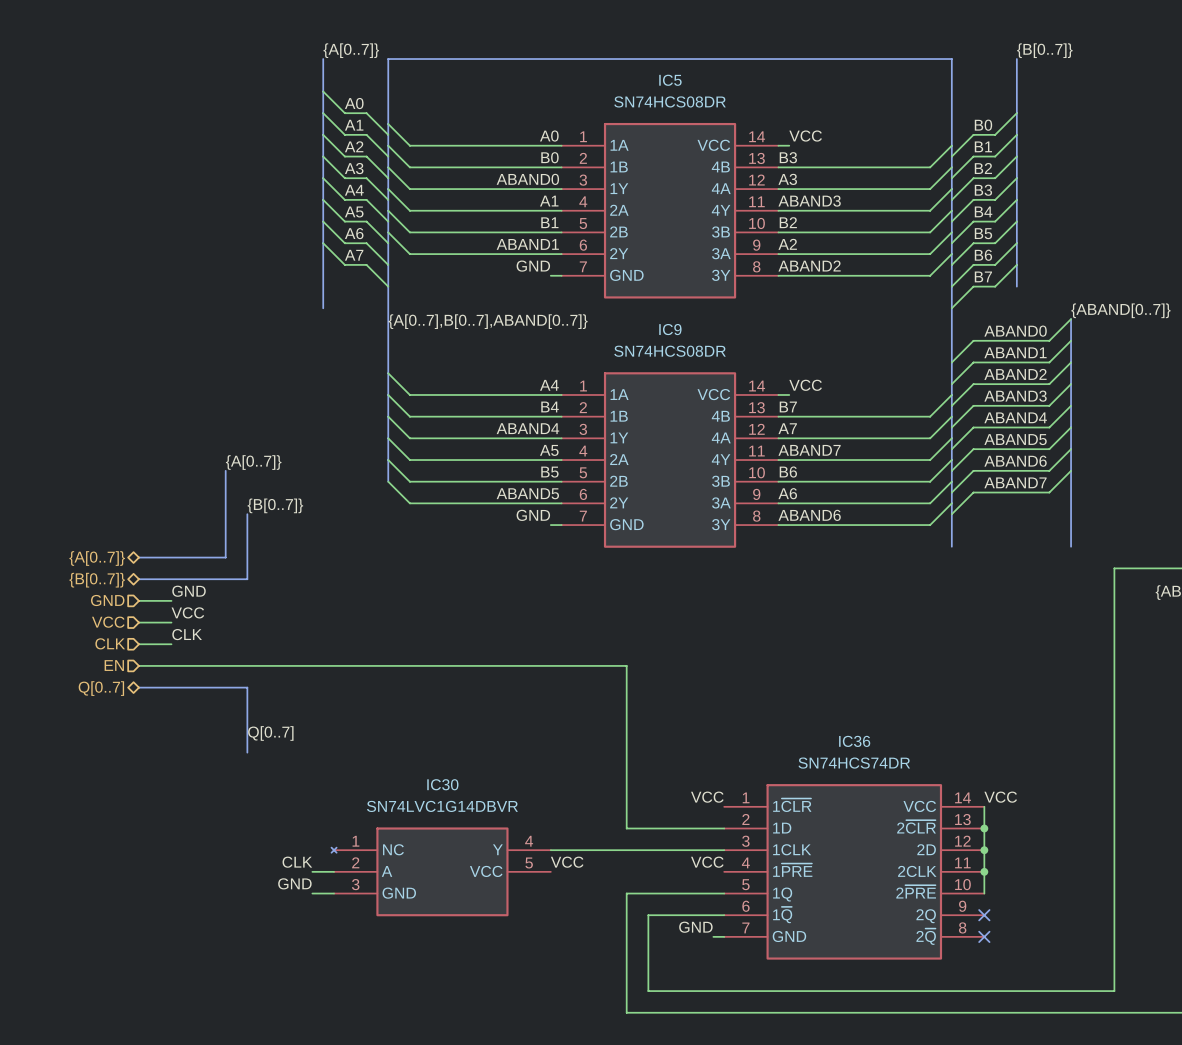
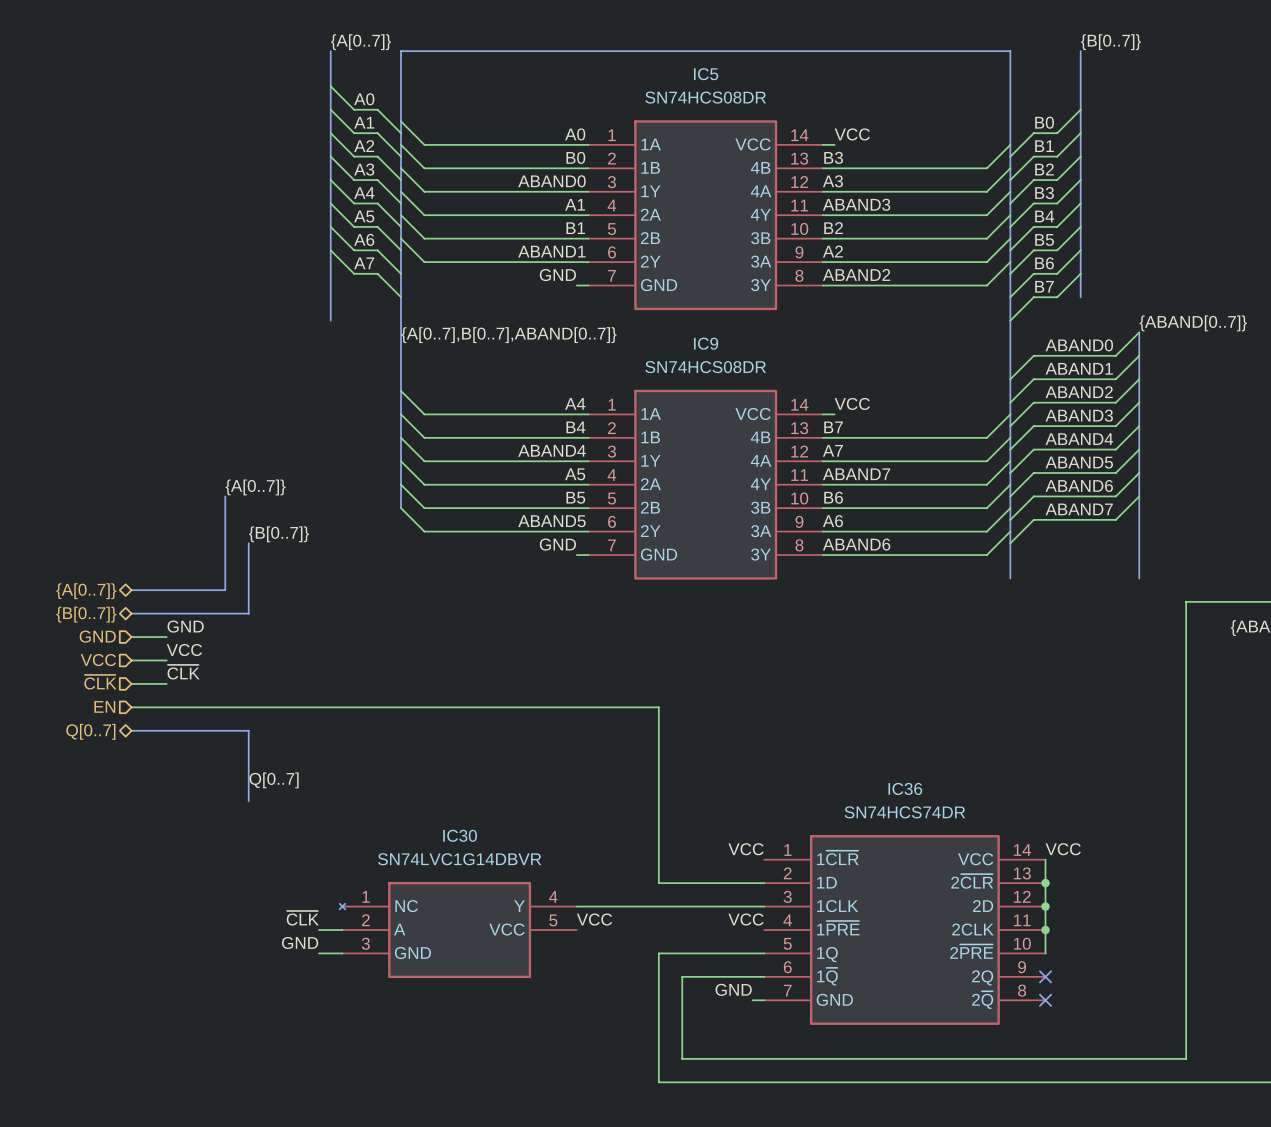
label: CLK (187, 634) -> ~{CLK} (183, 672)
hierarchical label: CLK (110, 643) -> ~{CLK} (100, 682)
label: CLK (297, 862) -> ~{CLK} (302, 918)

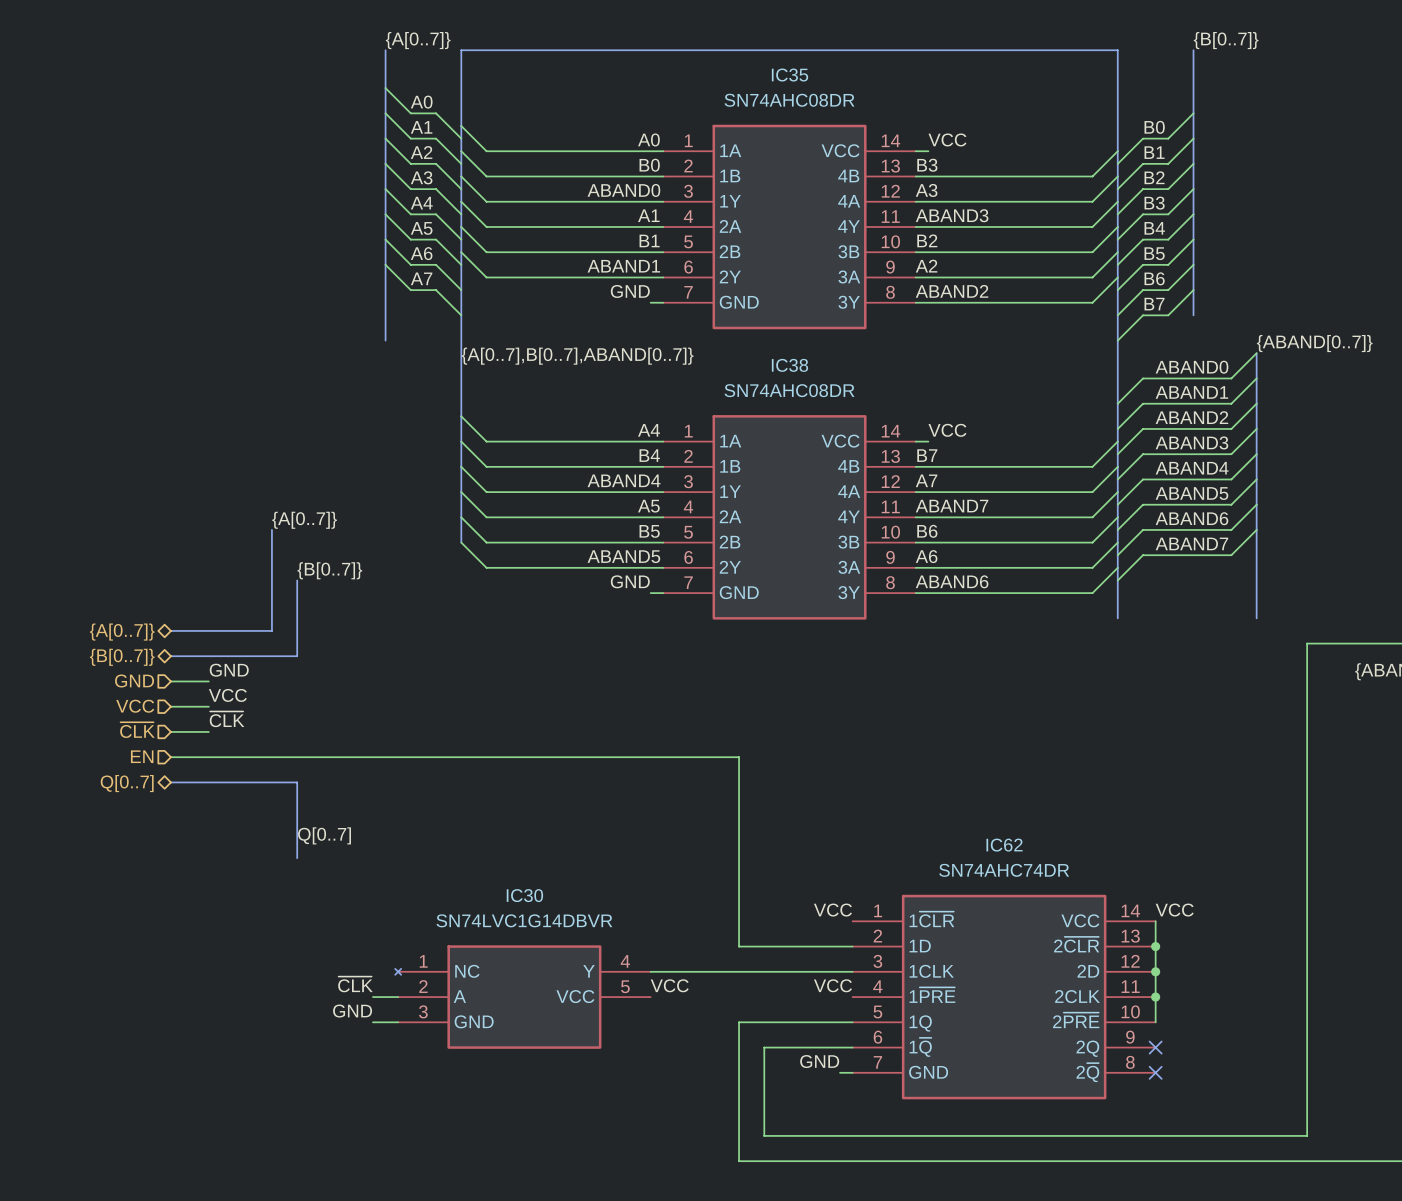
IC5 name: IC5 (706, 74) -> IC35 (790, 75)
IC5 value: SN74HCS08DR (705, 97) -> SN74AHC08DR (789, 100)
IC9 name: IC9 (706, 343) -> IC38 (789, 365)
IC9 value: SN74HCS08DR (705, 367) -> SN74AHC08DR (789, 390)
IC36 name: IC36 (905, 788) -> IC62 (1004, 845)
IC36 value: SN74HCS74DR (904, 812) -> SN74AHC74DR (1004, 870)

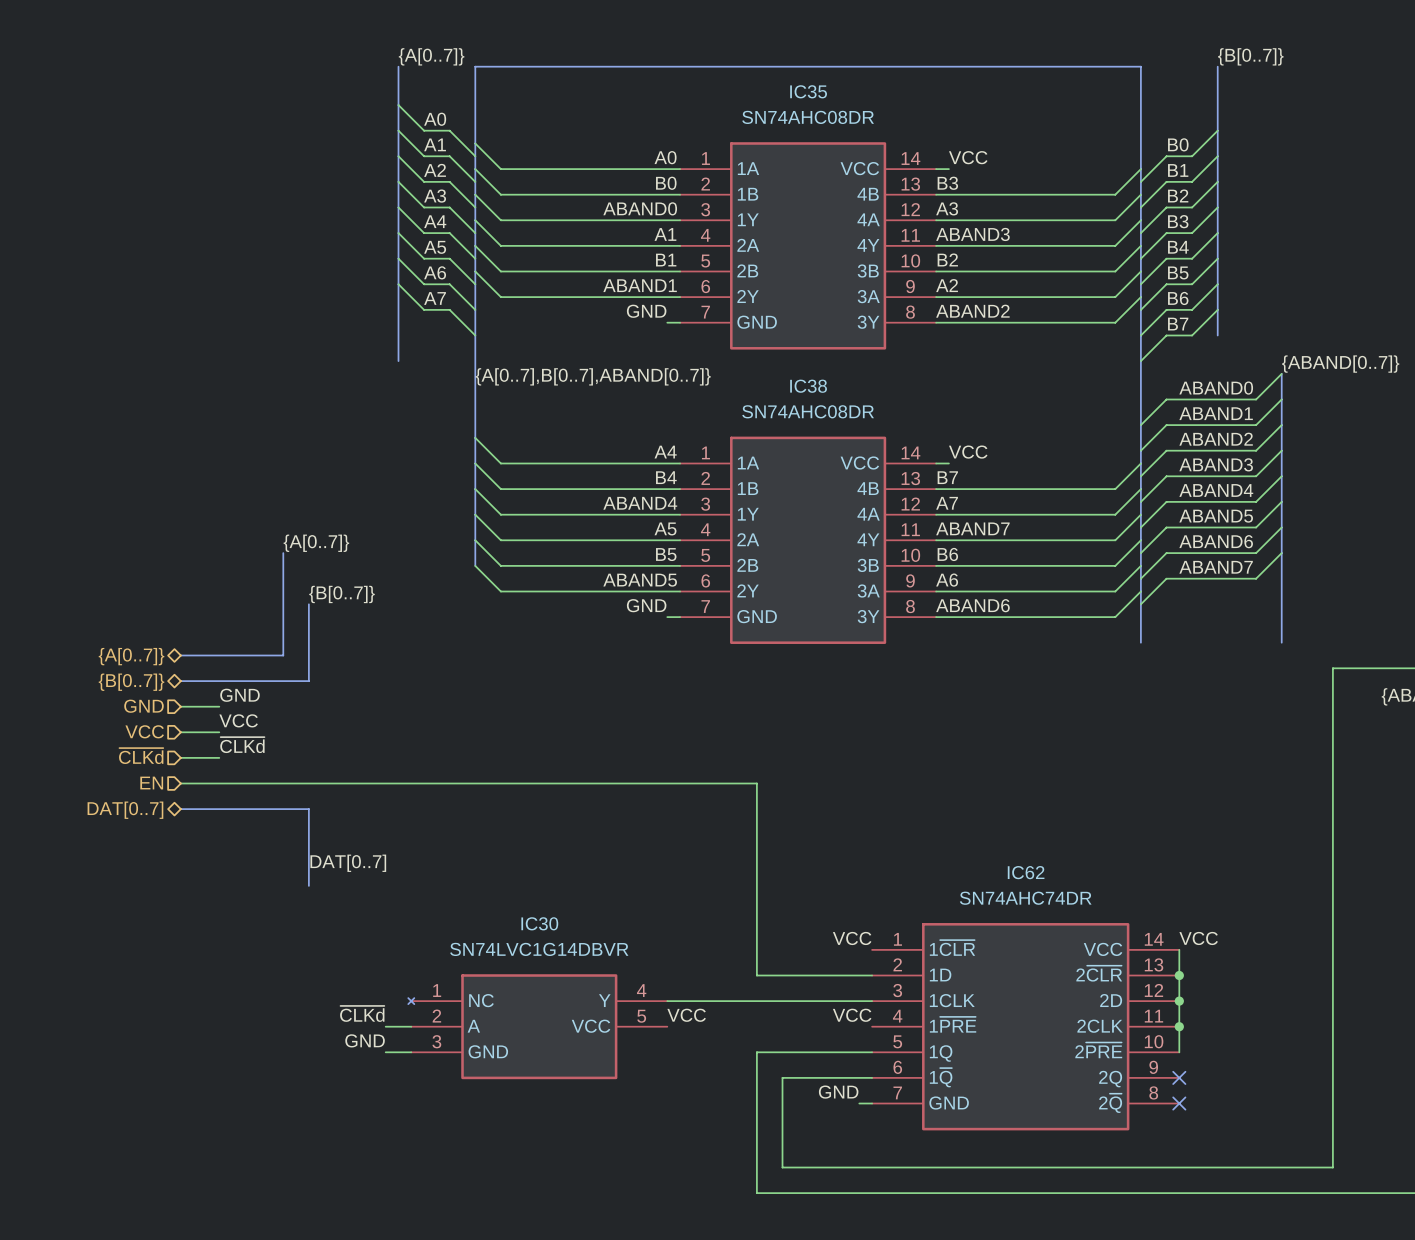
label: ~{CLK} (227, 719) -> ~{CLKd} (242, 745)
hierarchical label: ~{CLK} (137, 730) -> ~{CLKd} (141, 756)
hierarchical label: Q[0..7] (127, 783) -> DAT[0..7] (125, 810)
label: Q[0..7] (324, 835) -> DAT[0..7] (348, 863)
label: ~{CLK} (355, 984) -> ~{CLKd} (362, 1013)

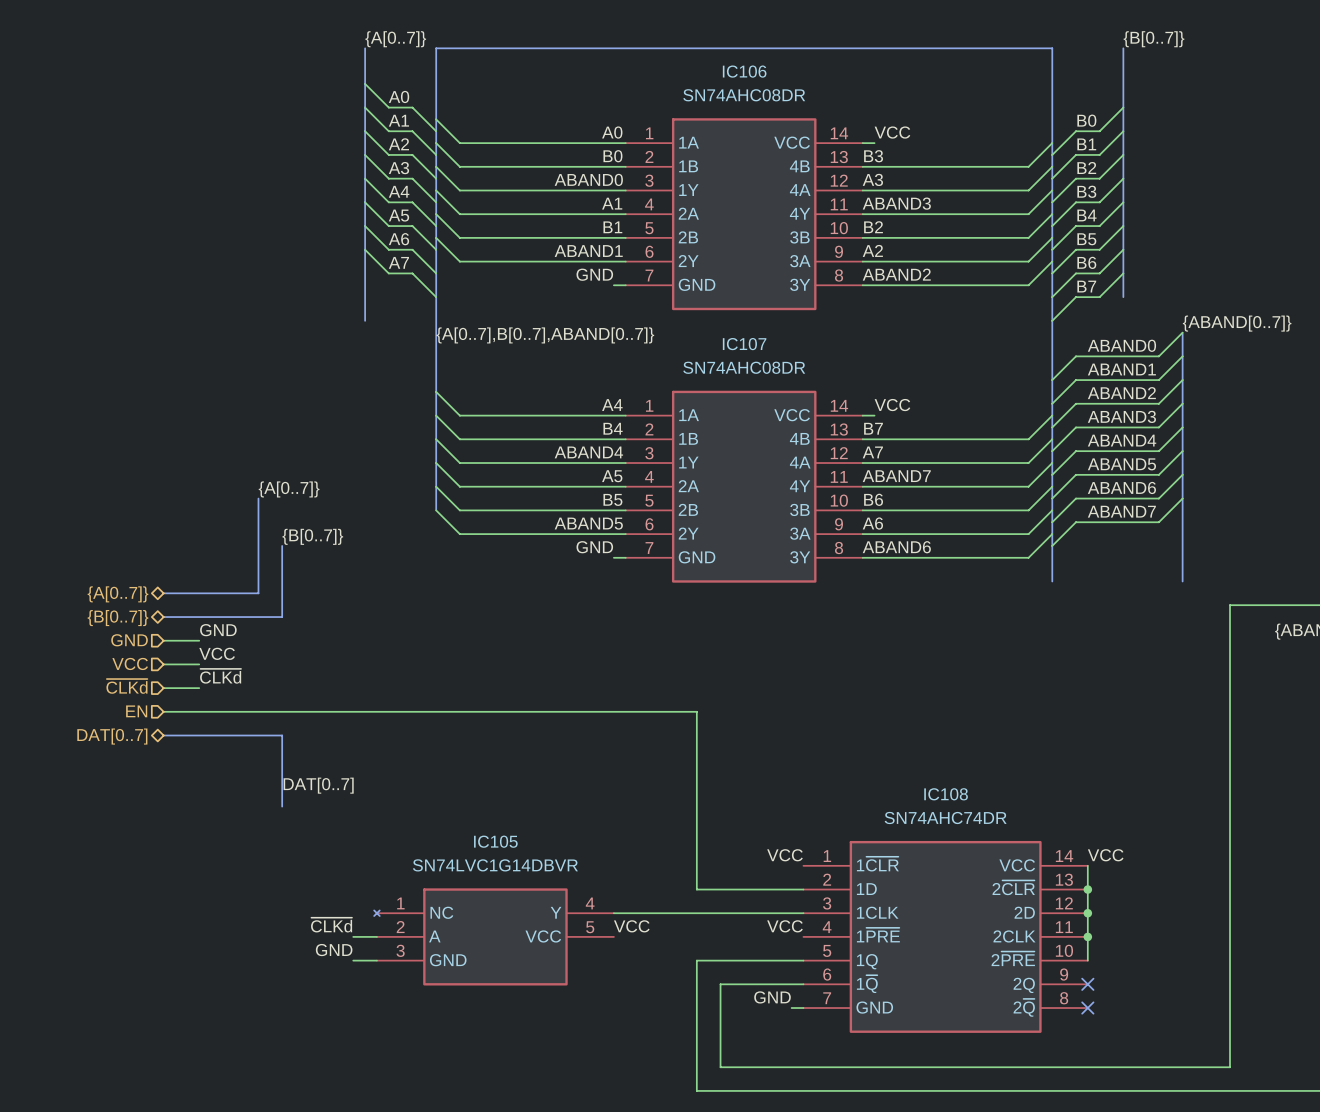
IC35 name: IC35 (808, 91) -> IC106 (744, 71)
IC38 name: IC38 (808, 386) -> IC107 (744, 344)
IC62 name: IC62 (1026, 872) -> IC108 (946, 794)
IC30 name: IC30 (539, 923) -> IC105 (495, 841)

